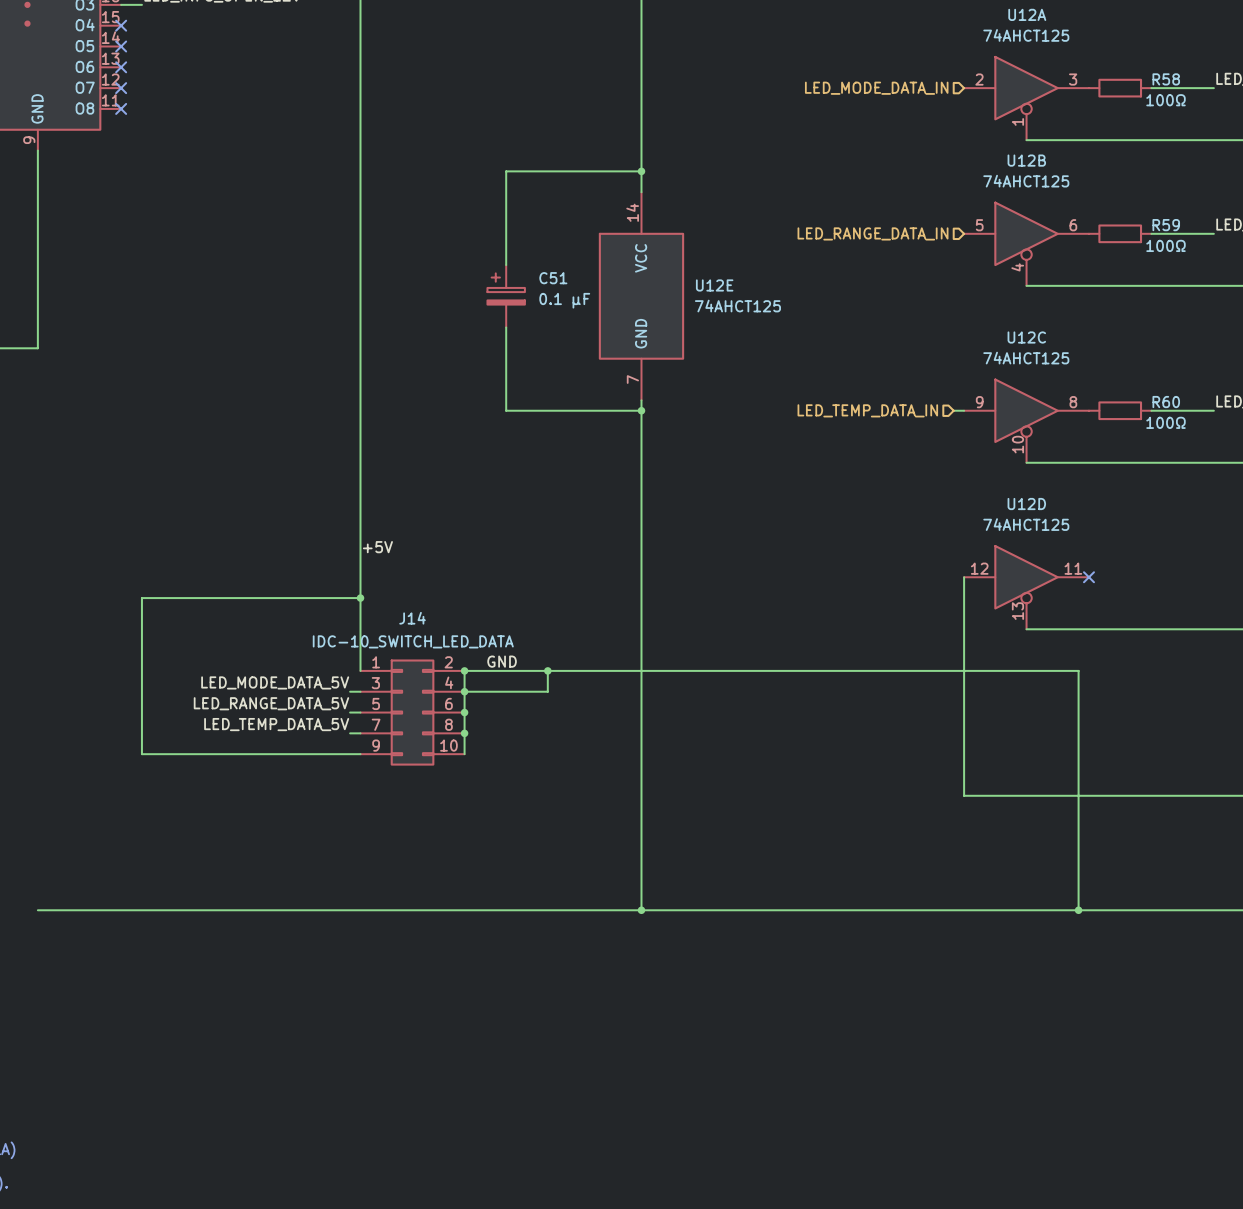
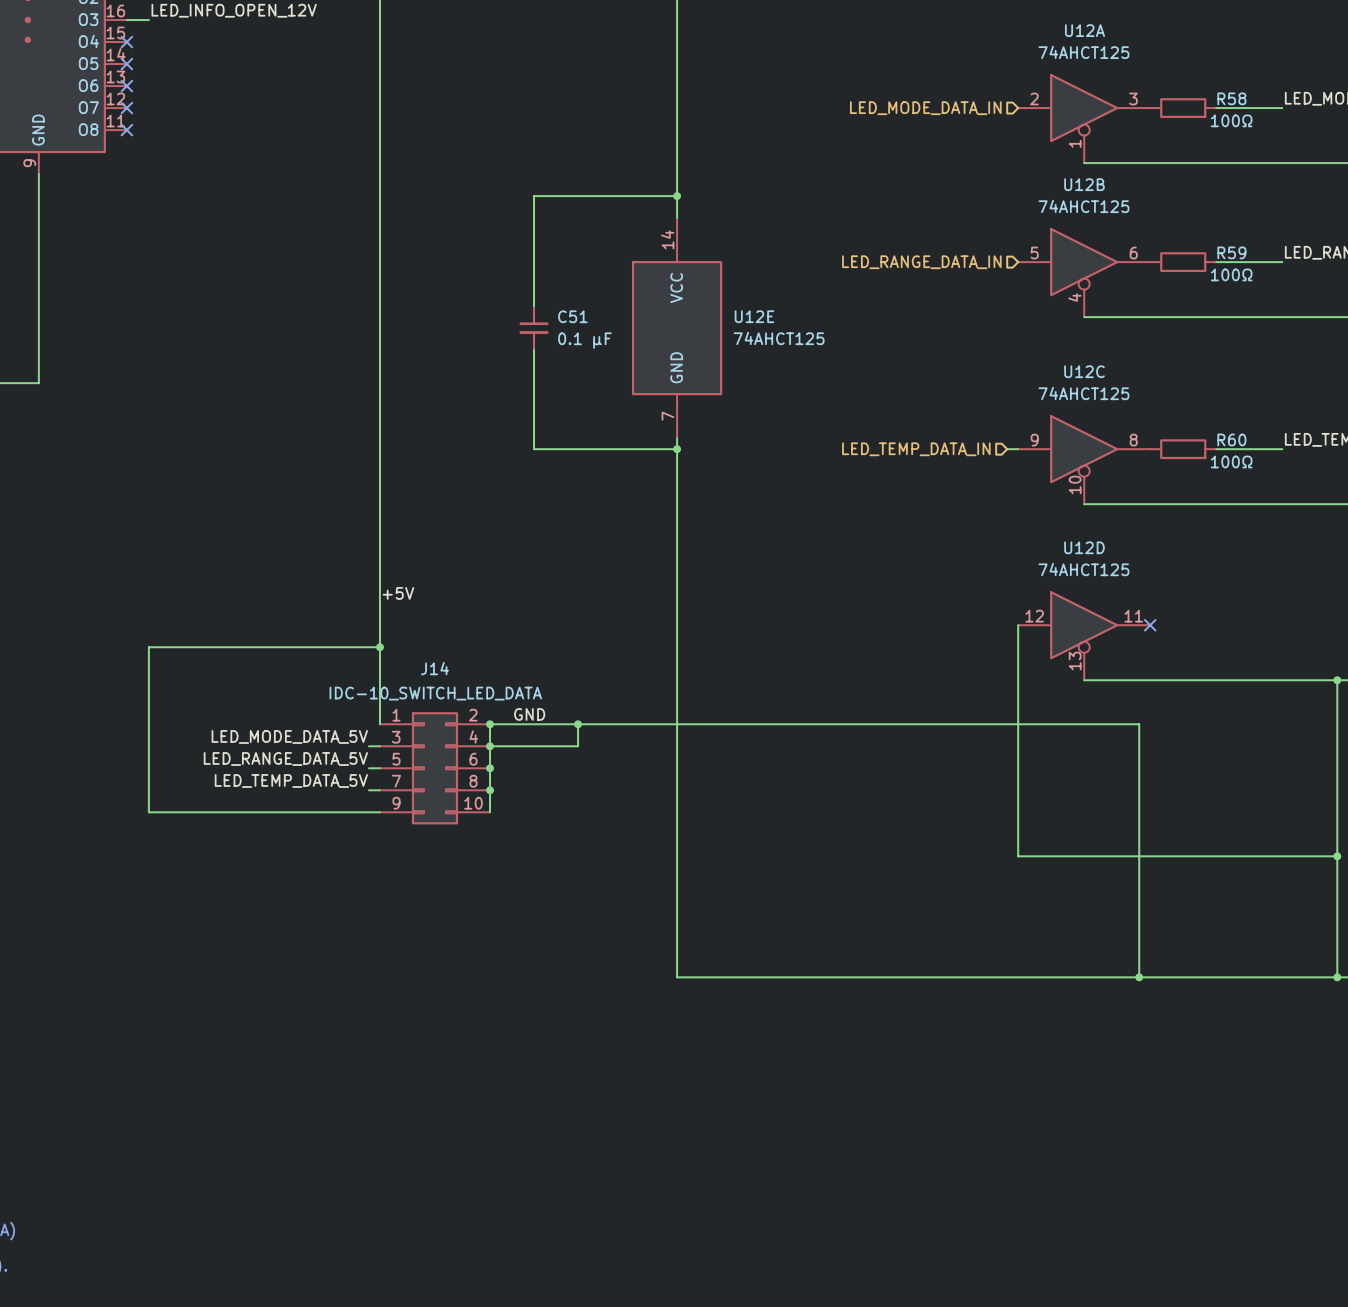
C51 symbol: [487, 265, 525, 328] -> [519, 306, 549, 351]
wire: (37, 910) (641, 910) -> none
junction: (641, 910) -> none

